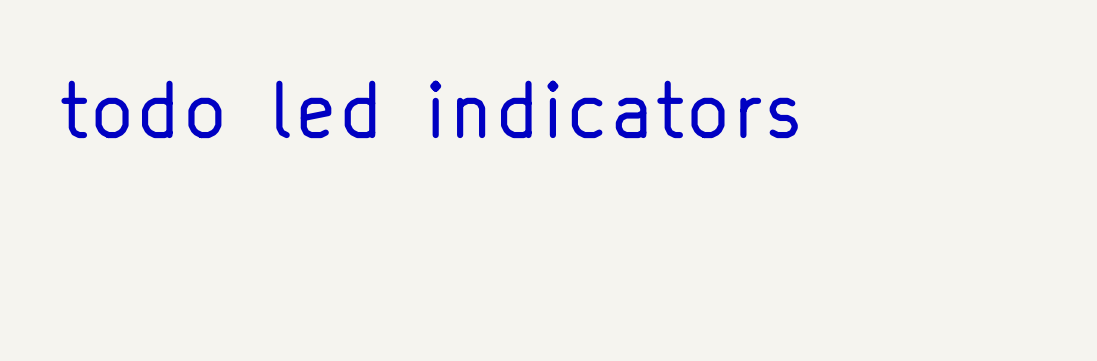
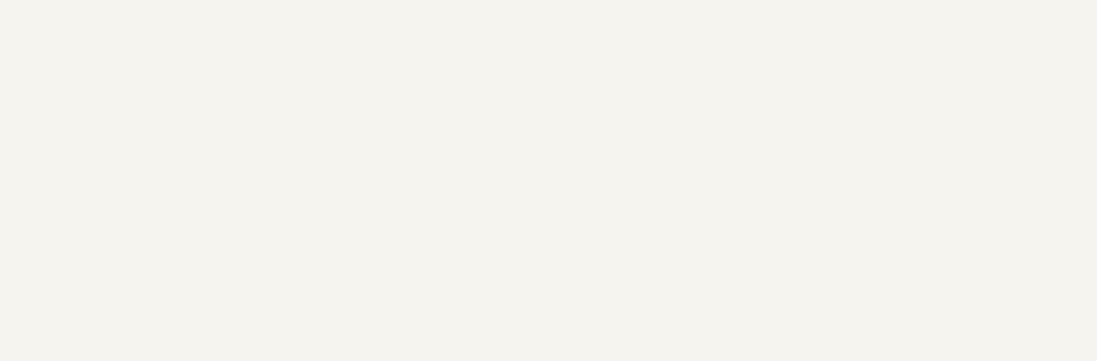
text: todo led indicators (429, 109) -> none

